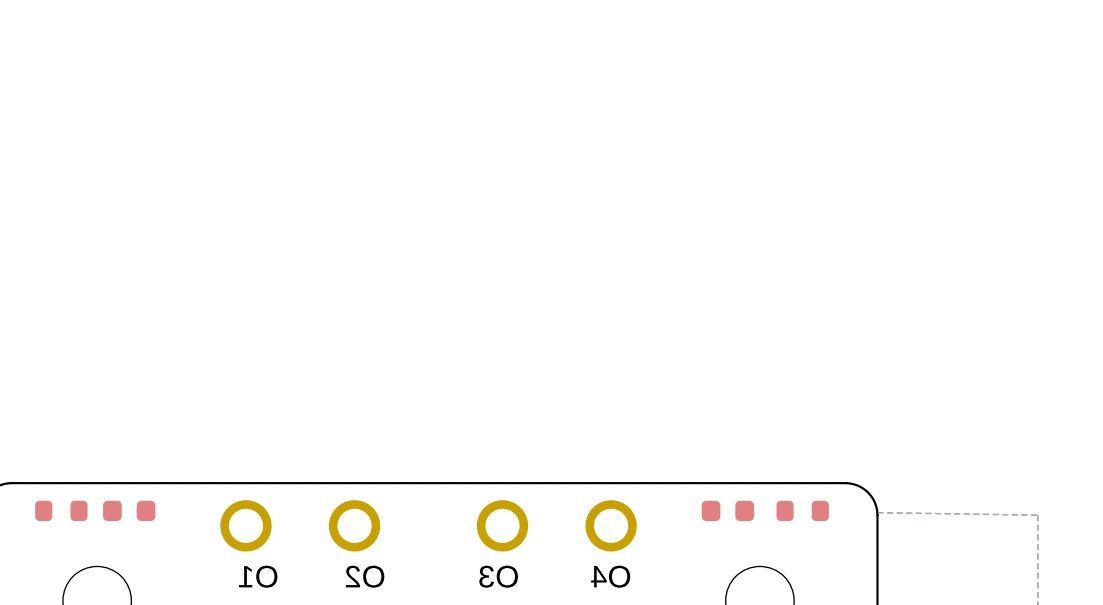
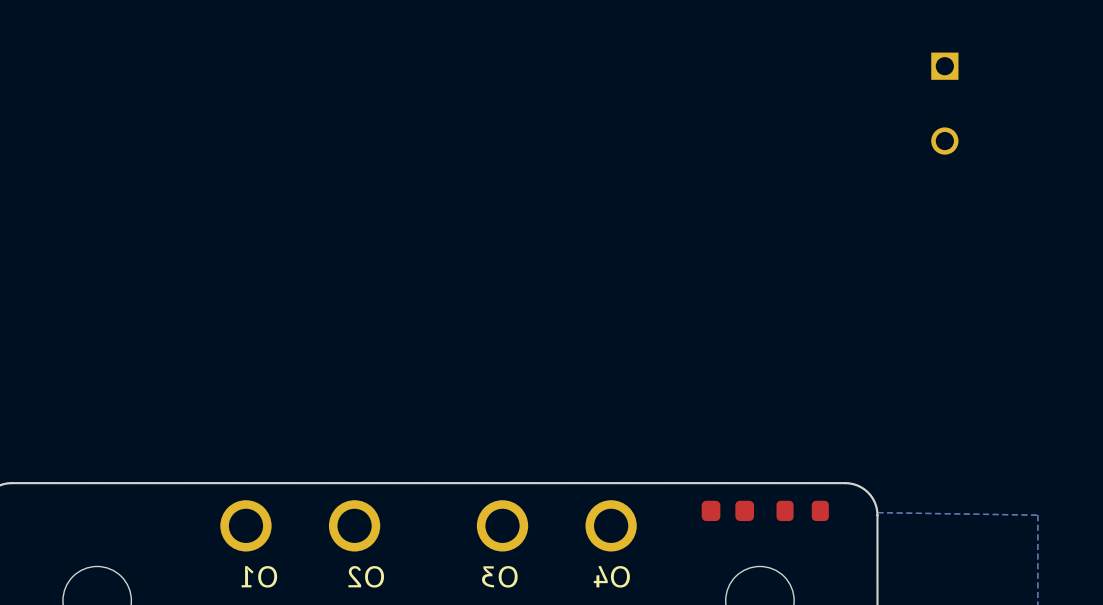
part: none -> (944, 103)
part: (61, 510) -> none
part: (129, 510) -> none

